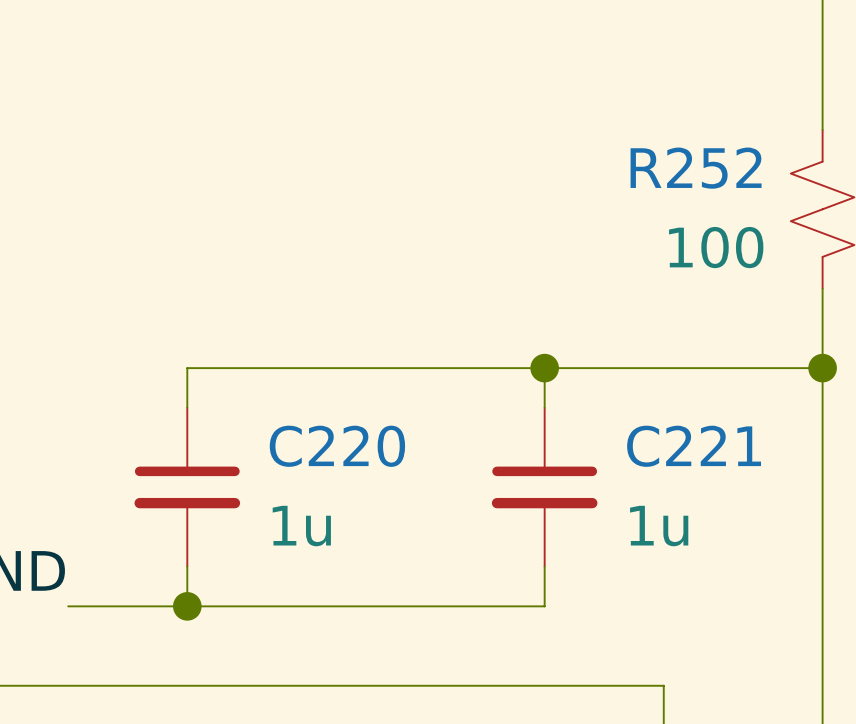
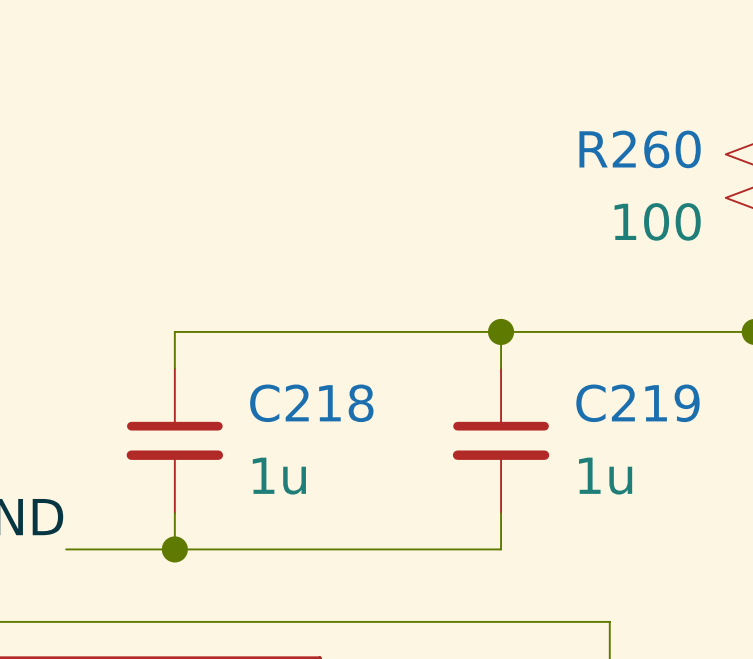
R252 name: R252 (696, 168) -> R260 (640, 149)
C220 name: C220 (337, 446) -> C218 (311, 403)
C221 name: C221 (694, 446) -> C219 (637, 403)

